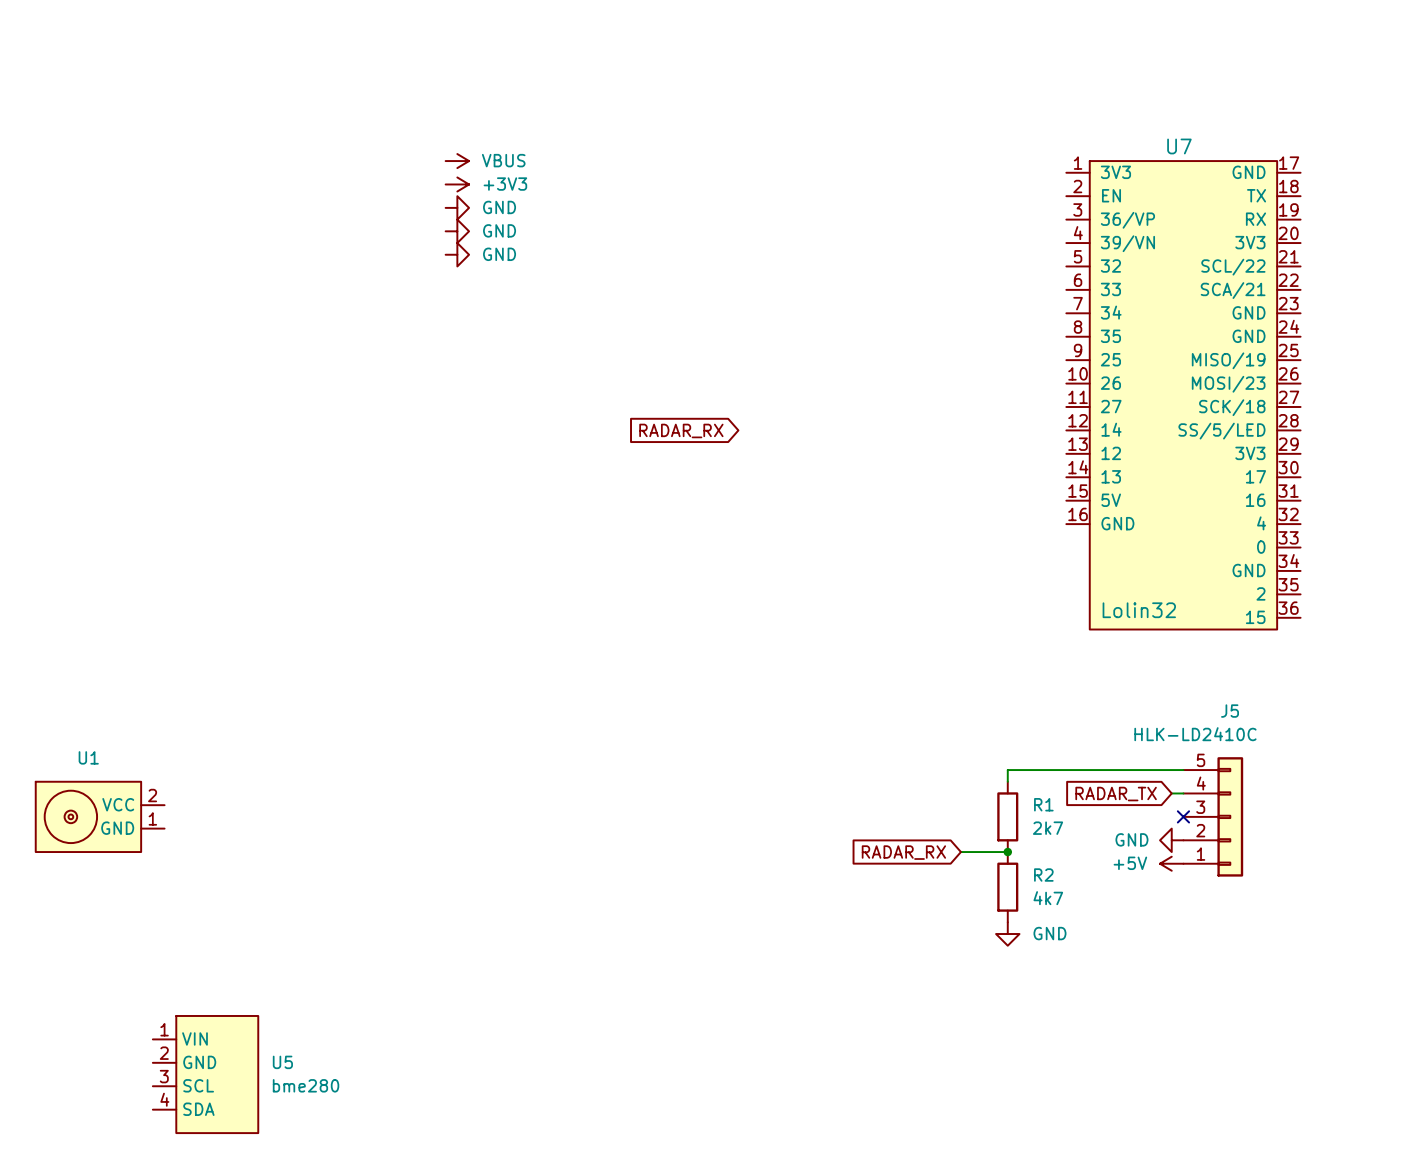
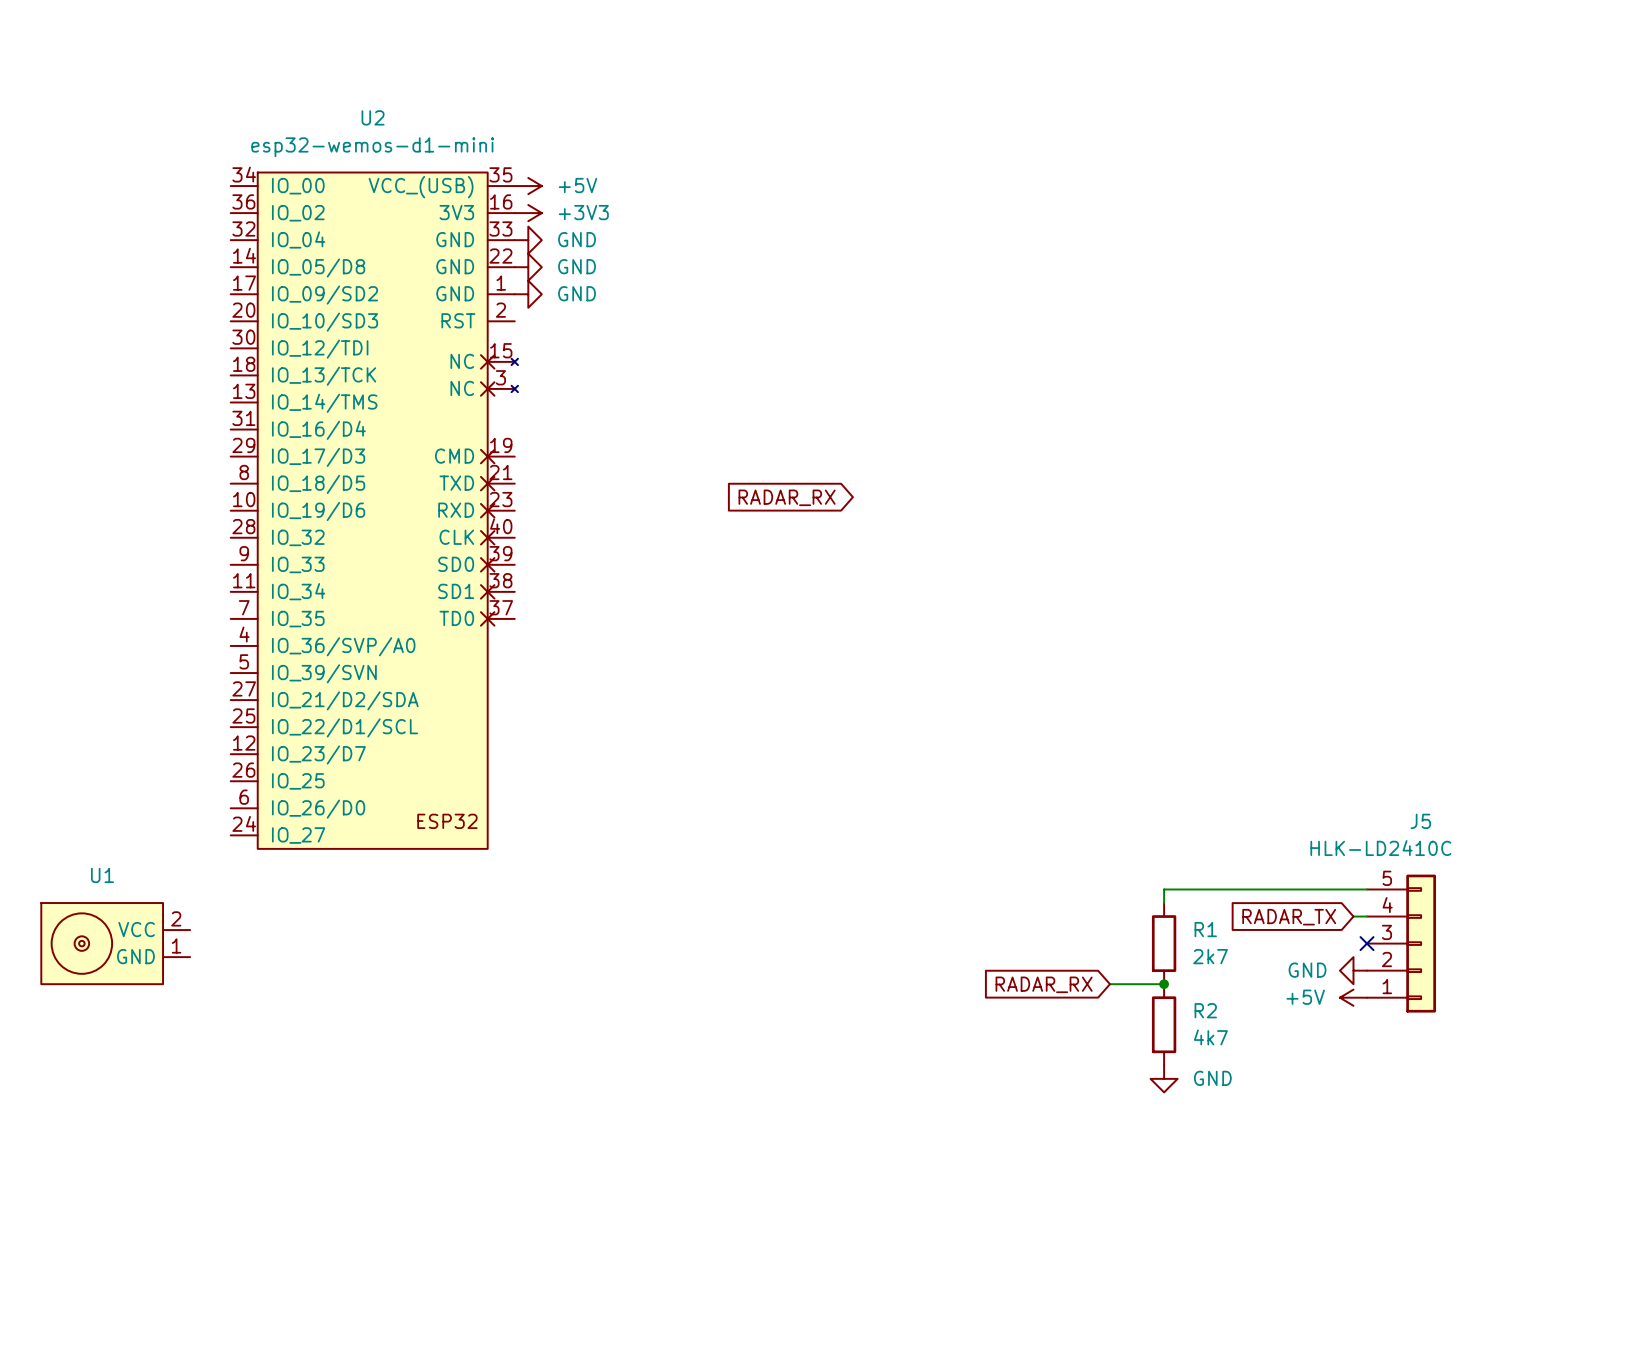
power symbol: VBUS (457, 161) -> +5V (528, 186)
U7: Lolin32 (1183, 395) -> none
U2: none -> esp32-wemos-d1-mini (374, 510)
U5: bme280 (205, 1074) -> none

